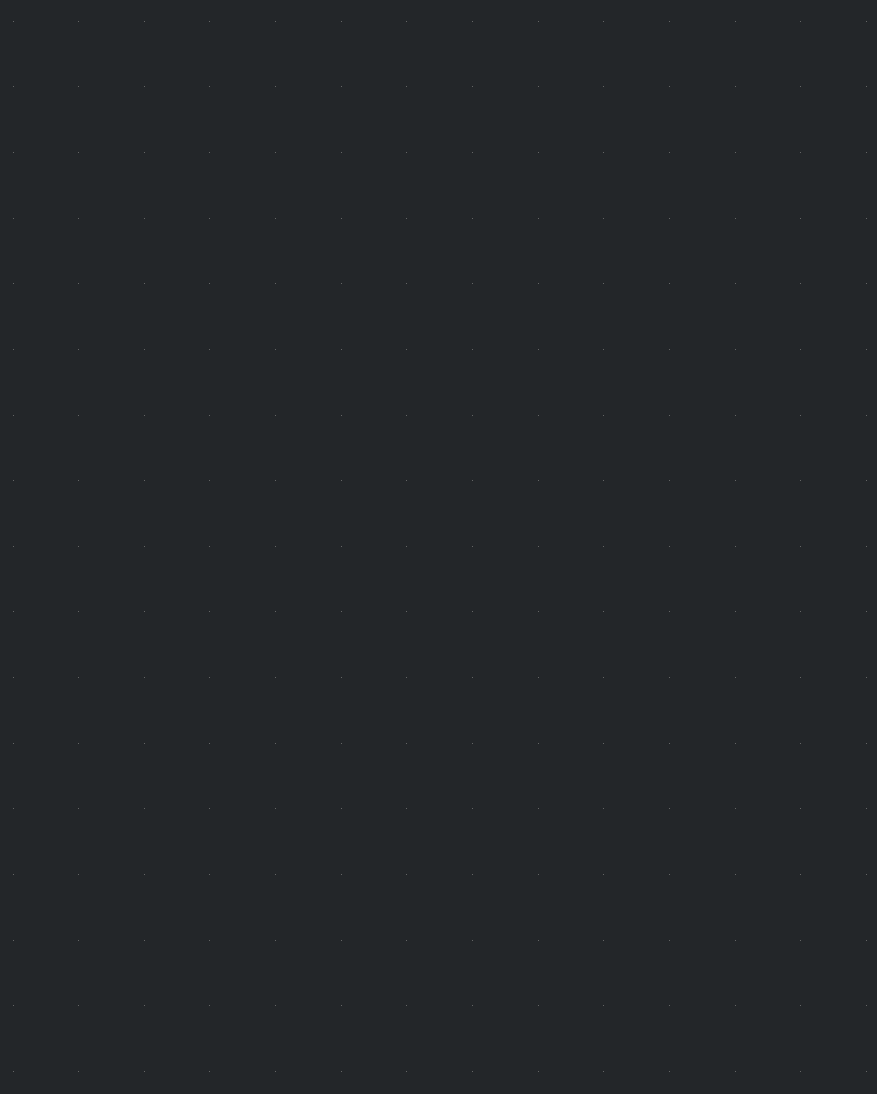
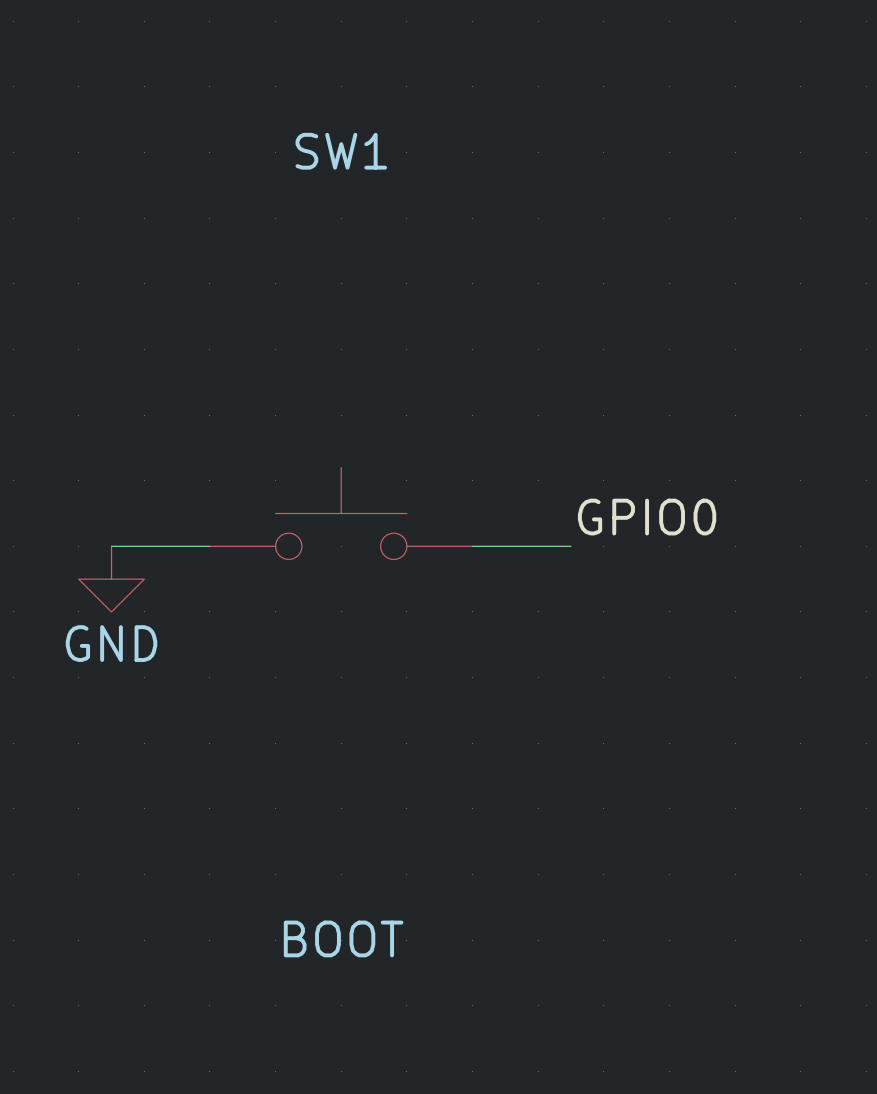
SW1: none -> BOOT (341, 513)
label: none -> GPIO0 (647, 517)
wire: none -> (111, 546) (209, 546)
wire: none -> (472, 546) (571, 546)
power symbol: none -> GND (111, 579)

